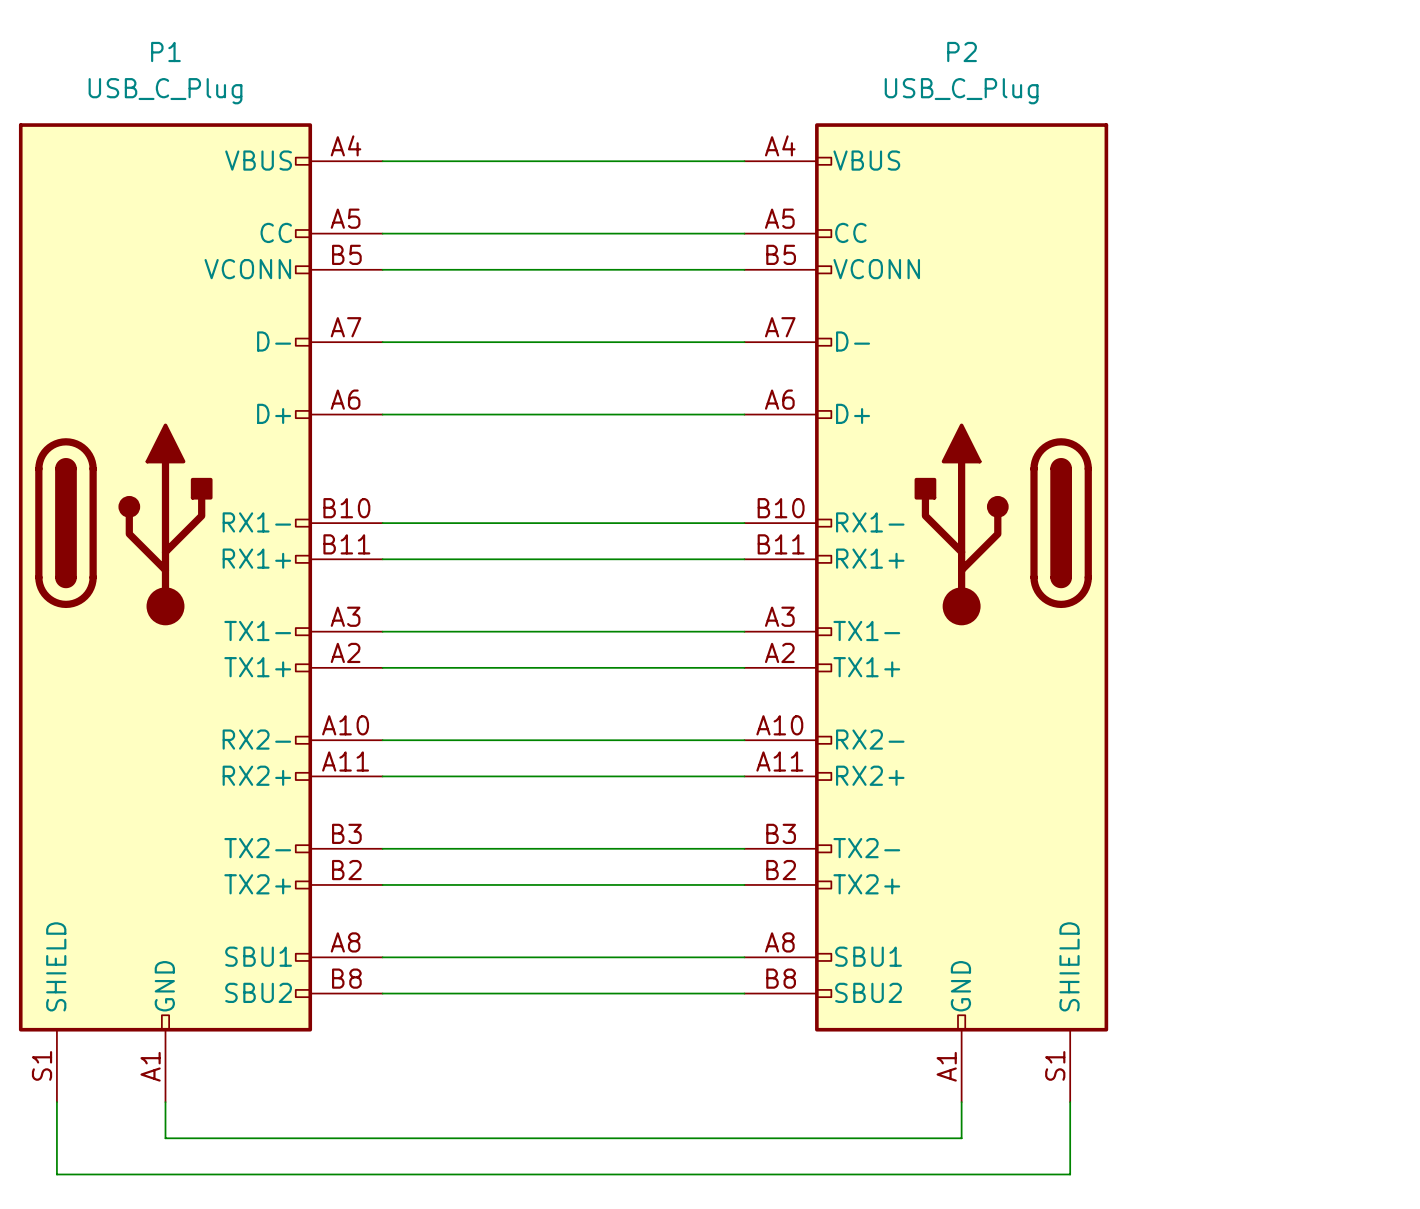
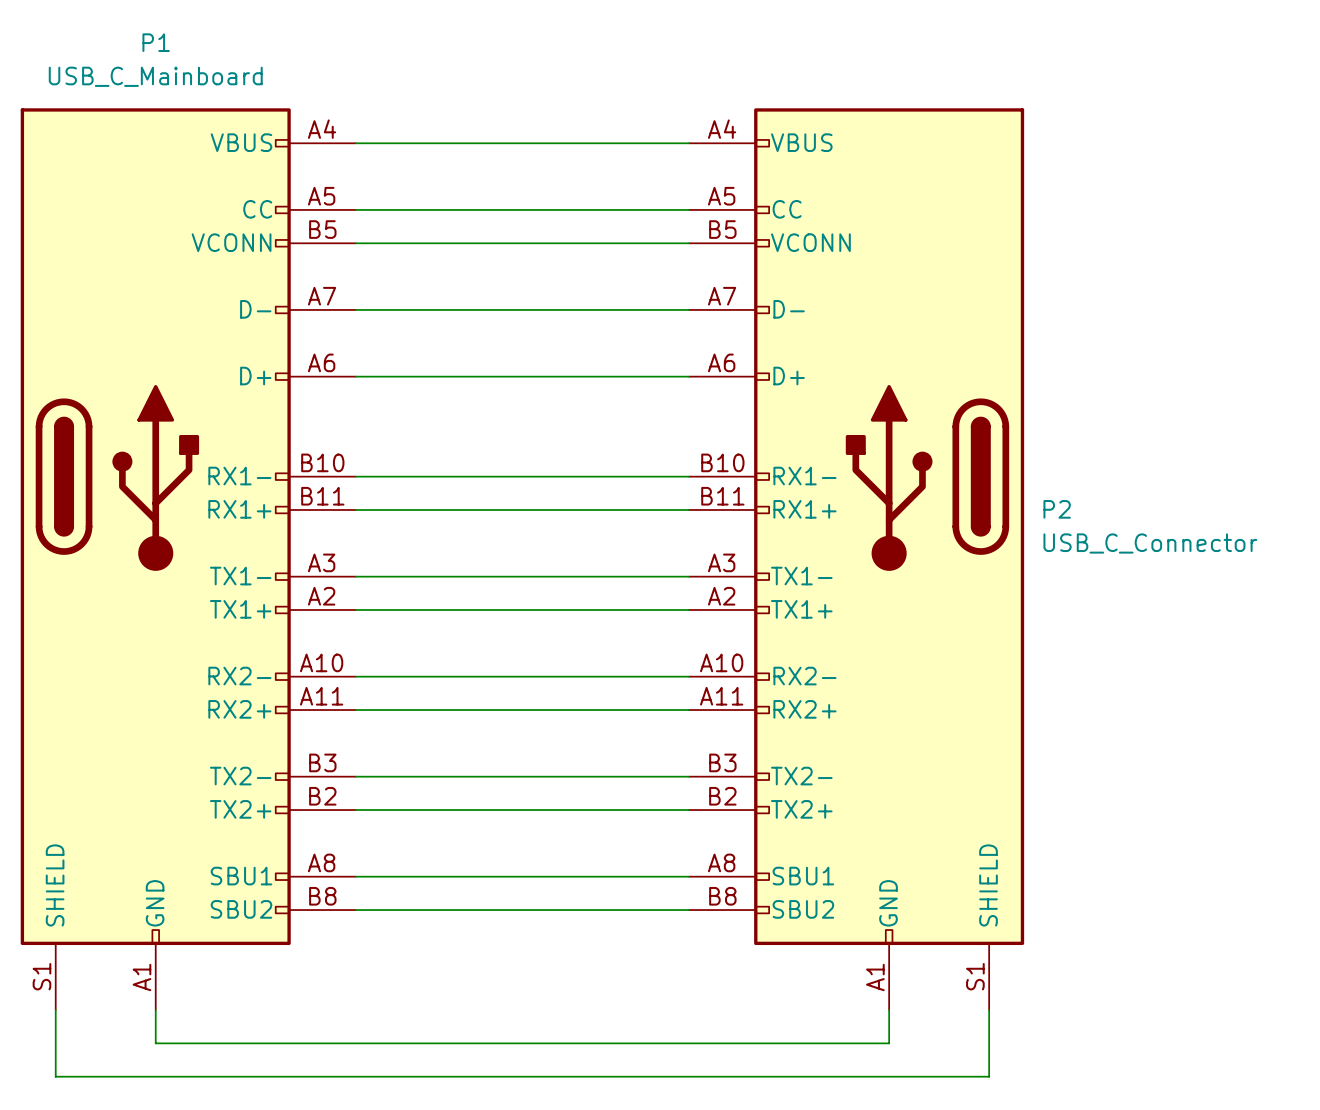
P2 name position: P2 (962, 51) -> P2 (1057, 509)
P1 value: USB_C_Plug (165, 91) -> USB_C_Mainboard (155, 76)
P2 value: USB_C_Plug (961, 91) -> USB_C_Connector (1150, 543)

